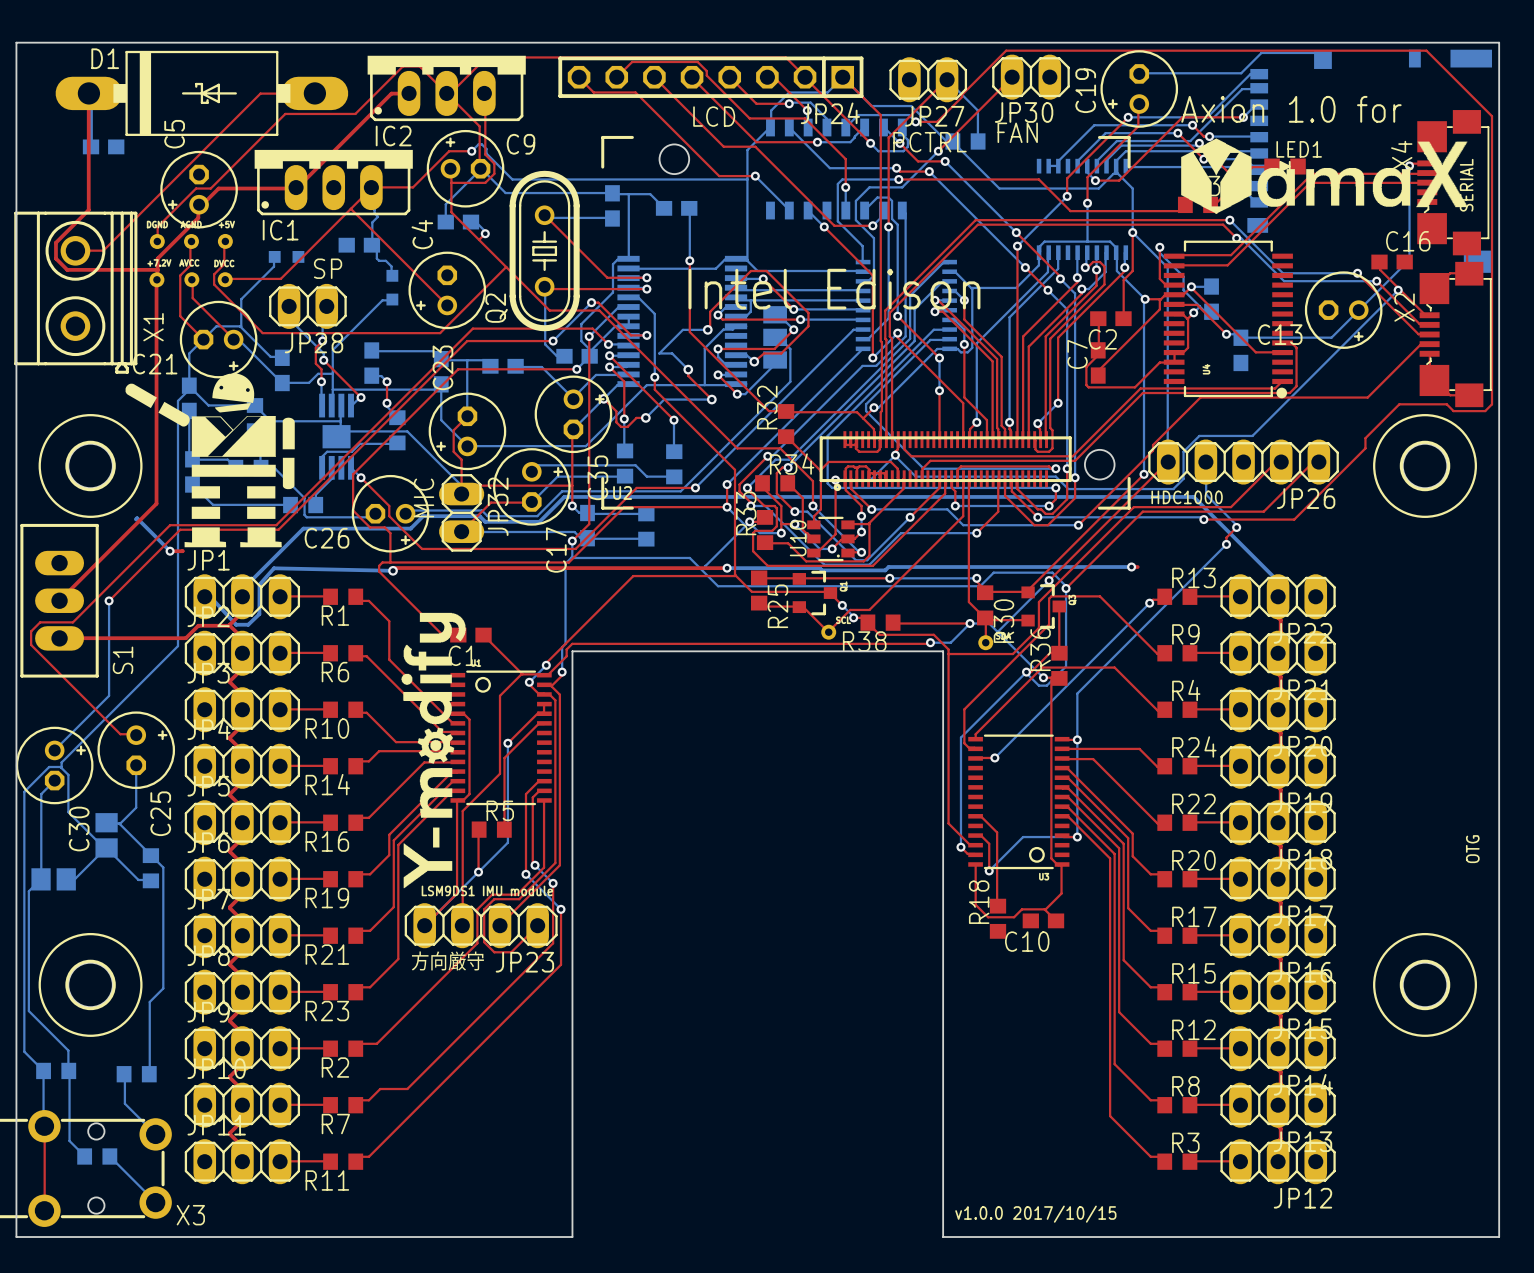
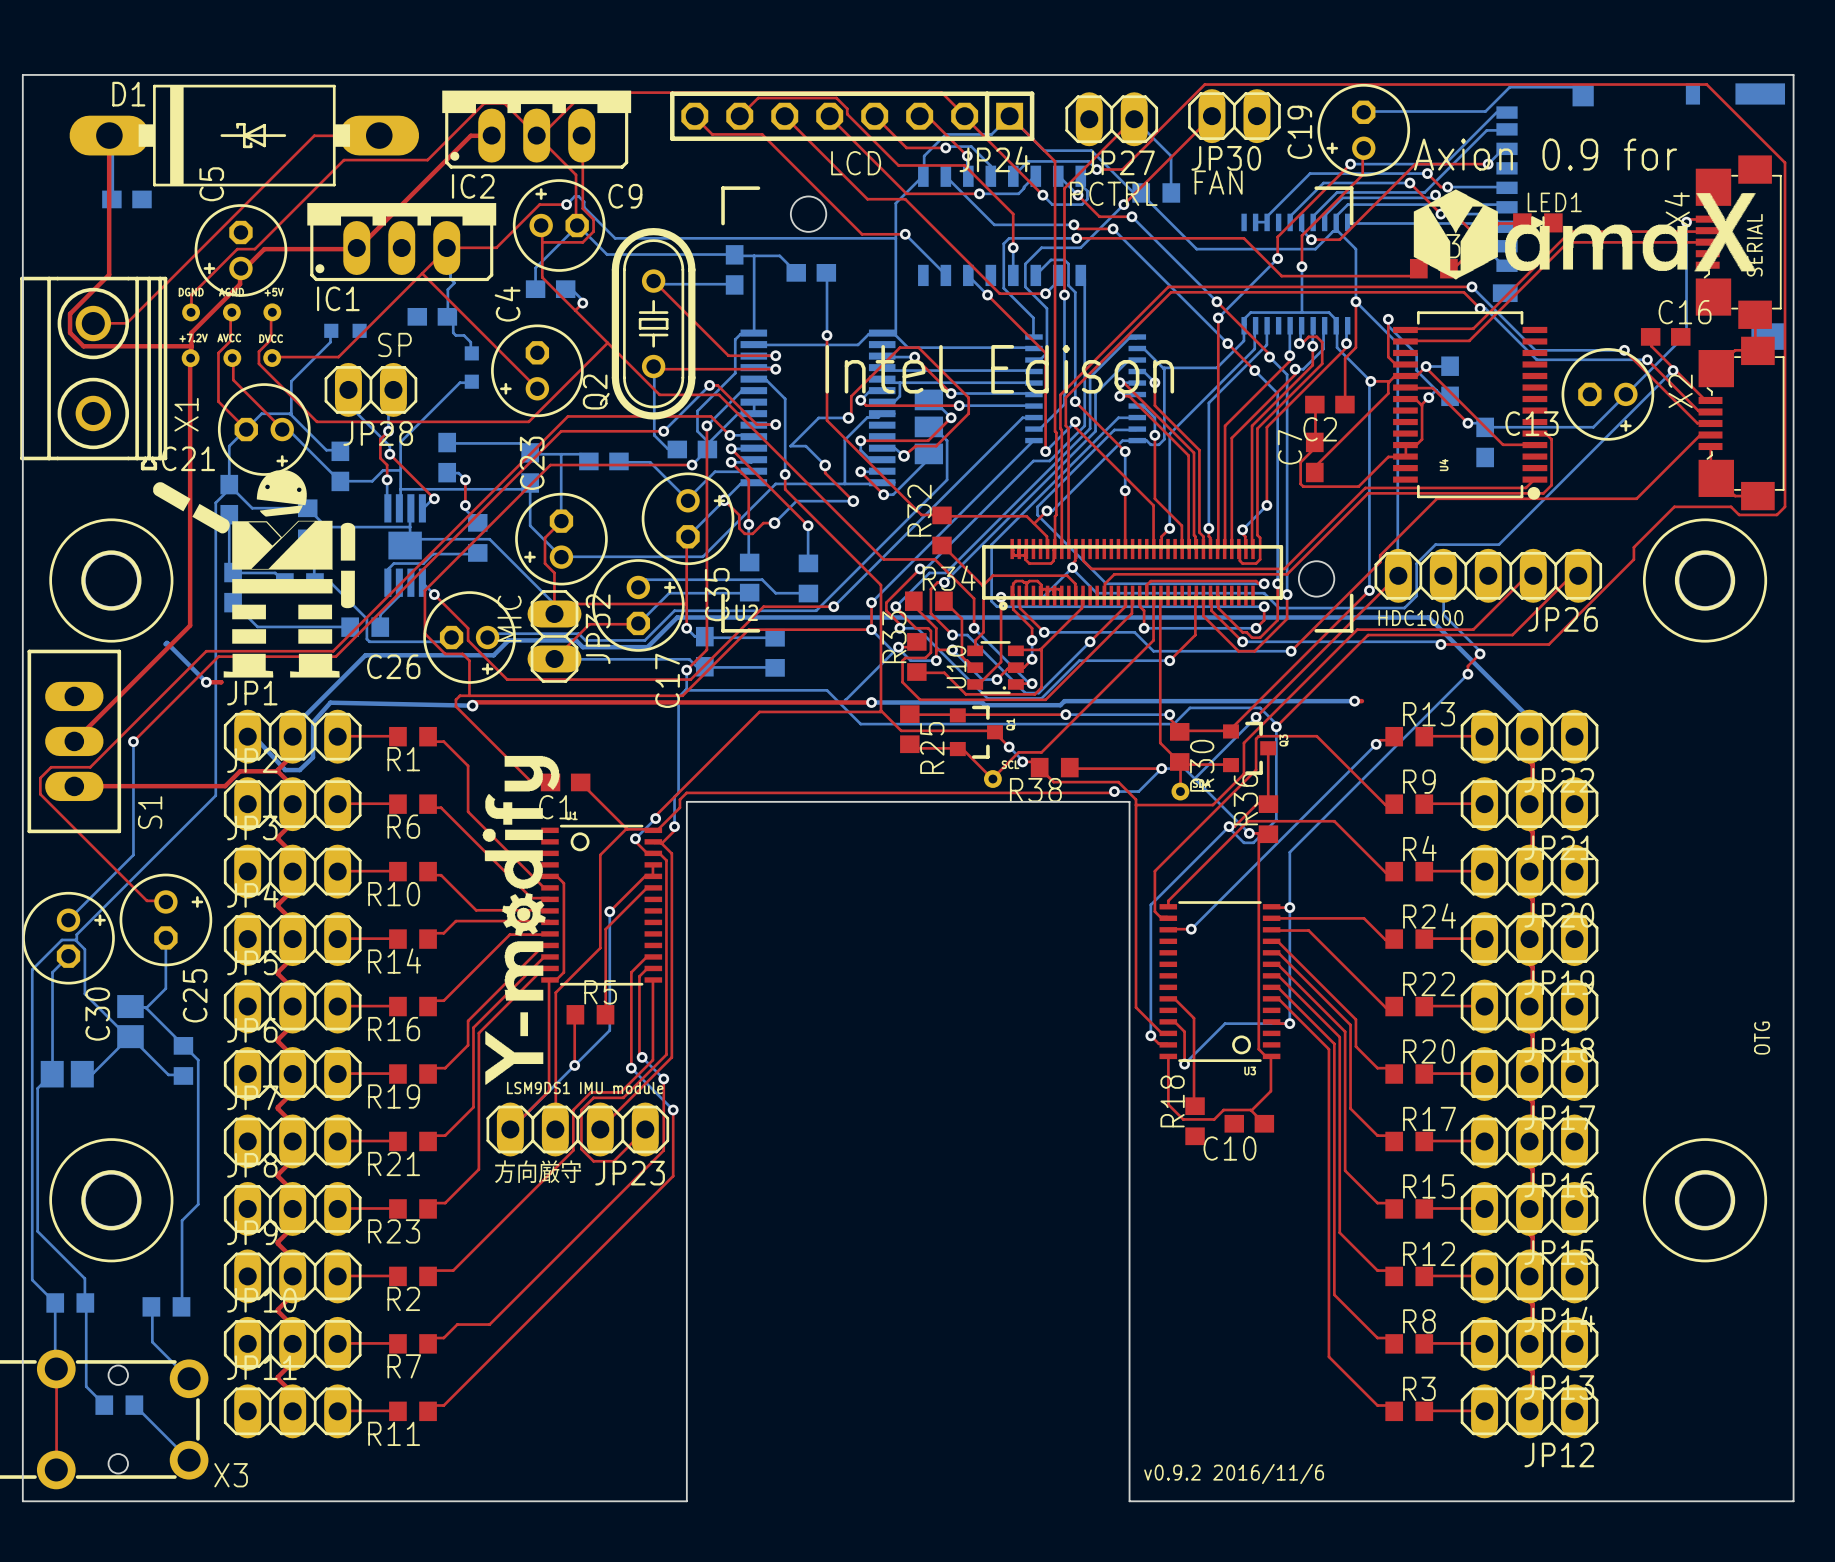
text: Axion 1.0 for (1291, 109) -> Axion 0.9 for (1545, 154)
text: v1.0.0 2017/10/15 (1035, 1214) -> v0.9.2 2016/11/6 (1234, 1473)

